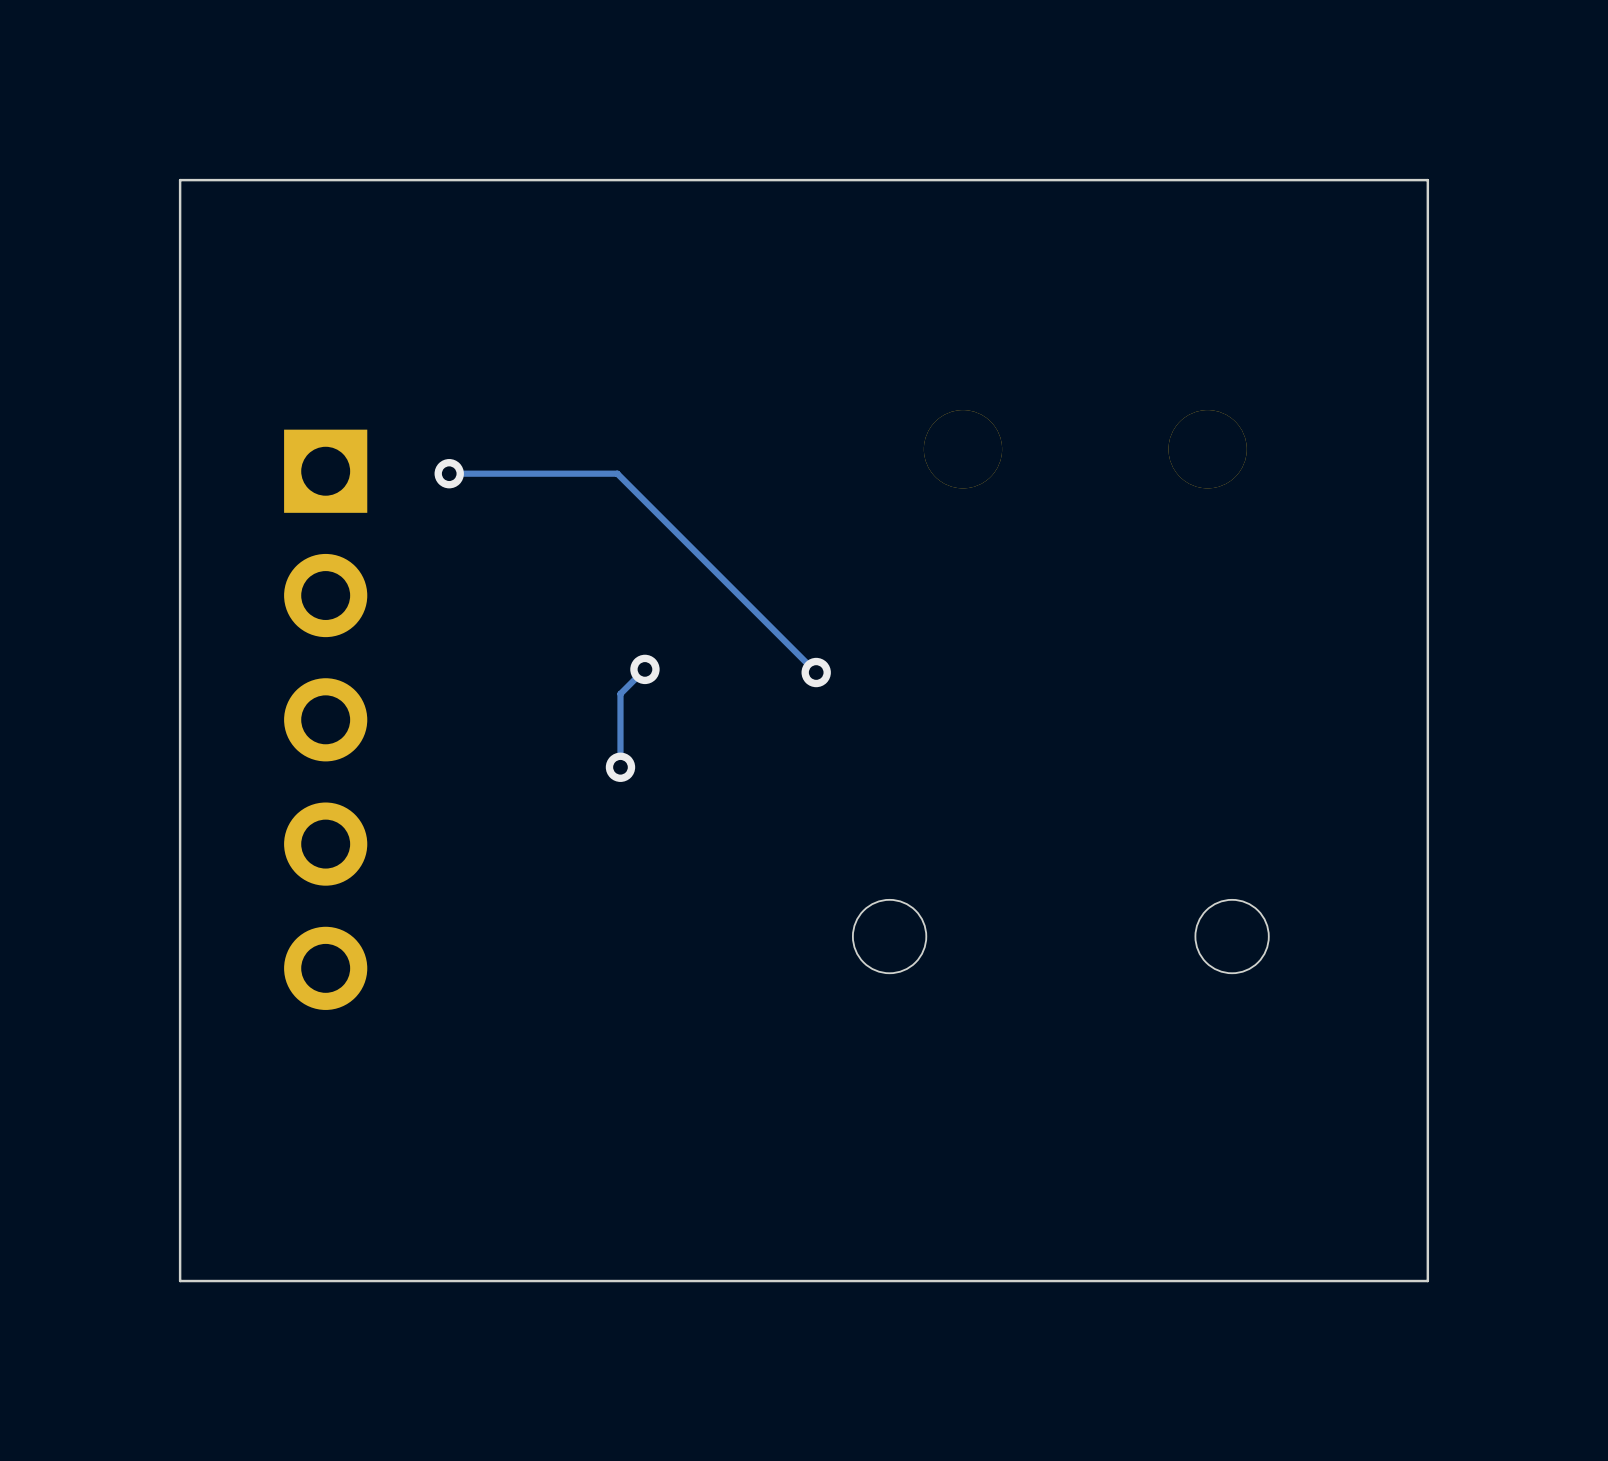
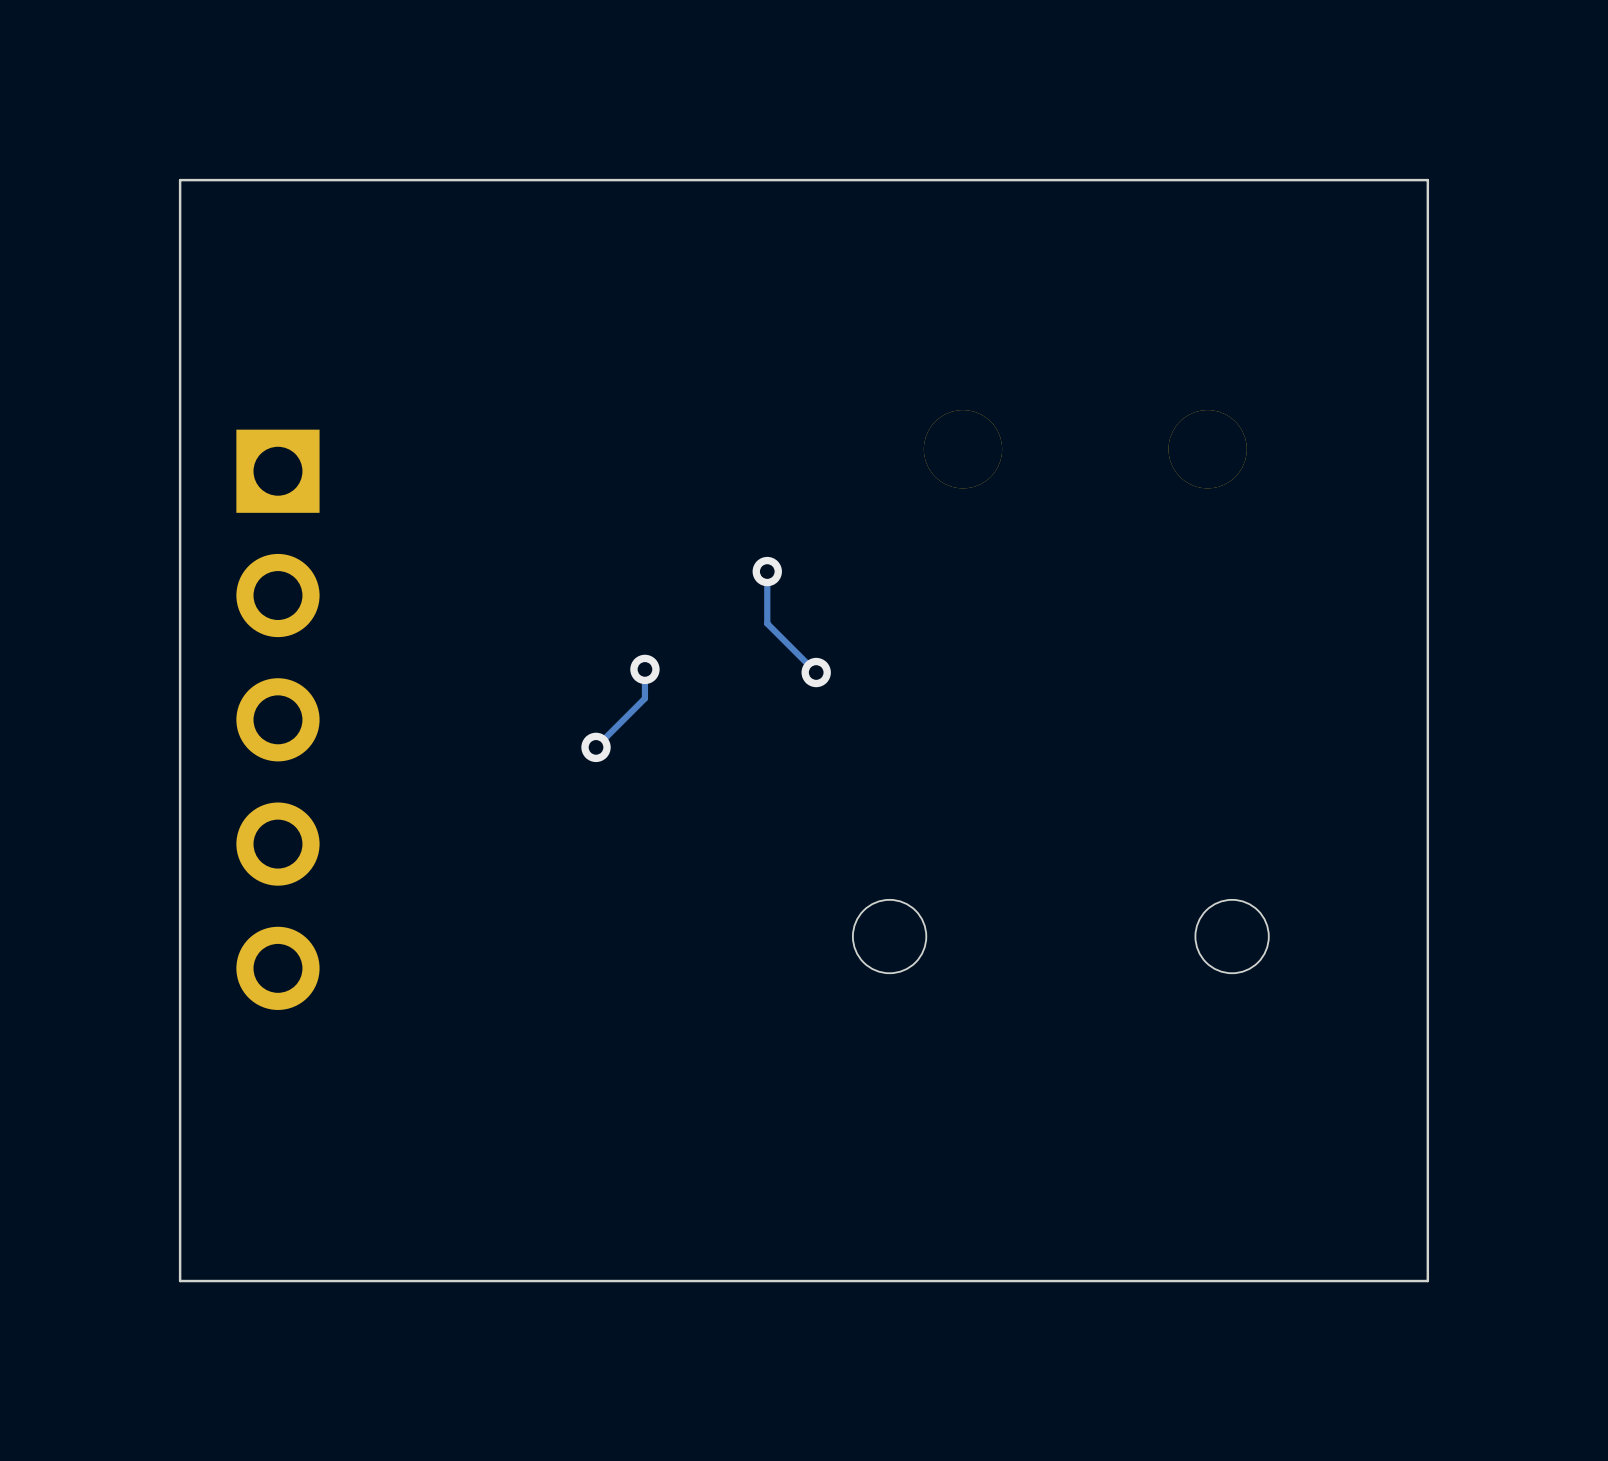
track: (449, 473) (617, 473) (767, 623) -> (767, 571) (767, 623)
via: (449, 473) -> none
via: none -> (767, 571)
track: (644, 669) (620, 693) (620, 767) -> (644, 669) (644, 698) (596, 747)
part position: (325, 719) -> (277, 719)
via position: (620, 767) -> (596, 747)

